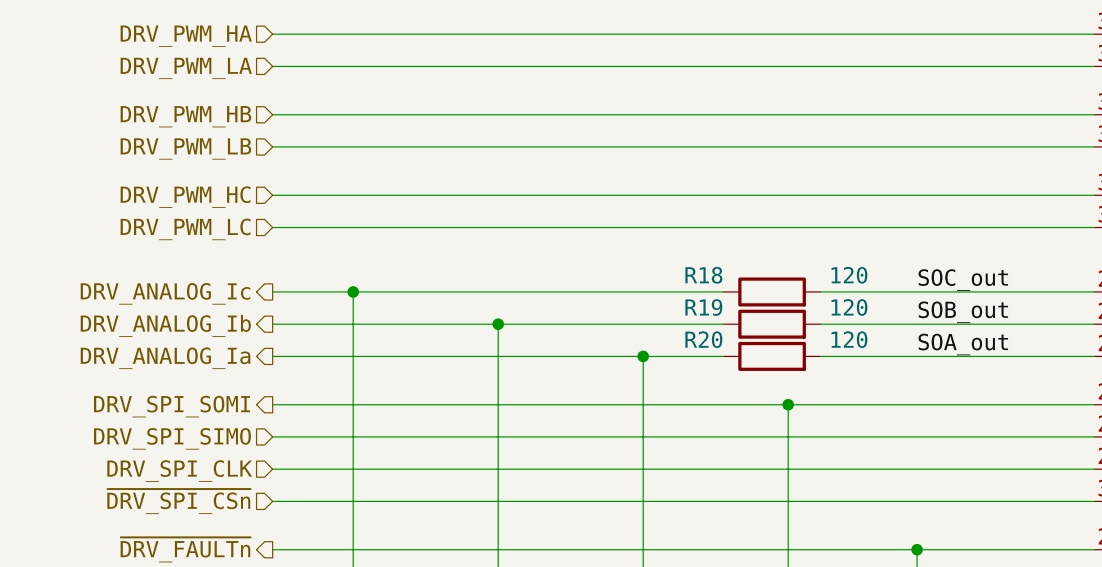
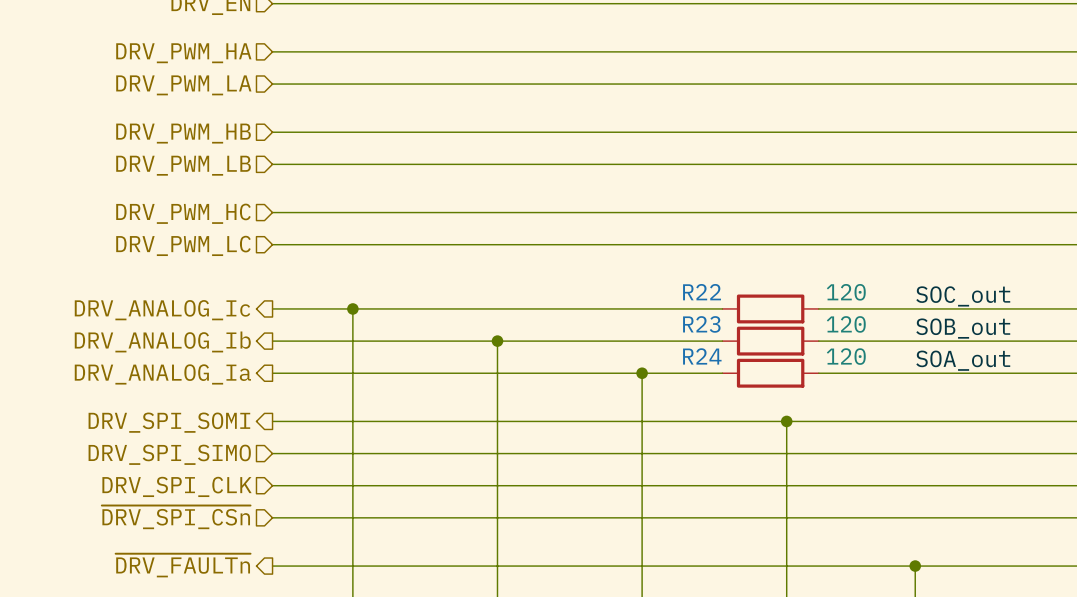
R18 name: R18 (703, 275) -> R22 (702, 292)
R19 name: R19 (703, 307) -> R23 (701, 324)
R20 name: R20 (703, 339) -> R24 (702, 356)

